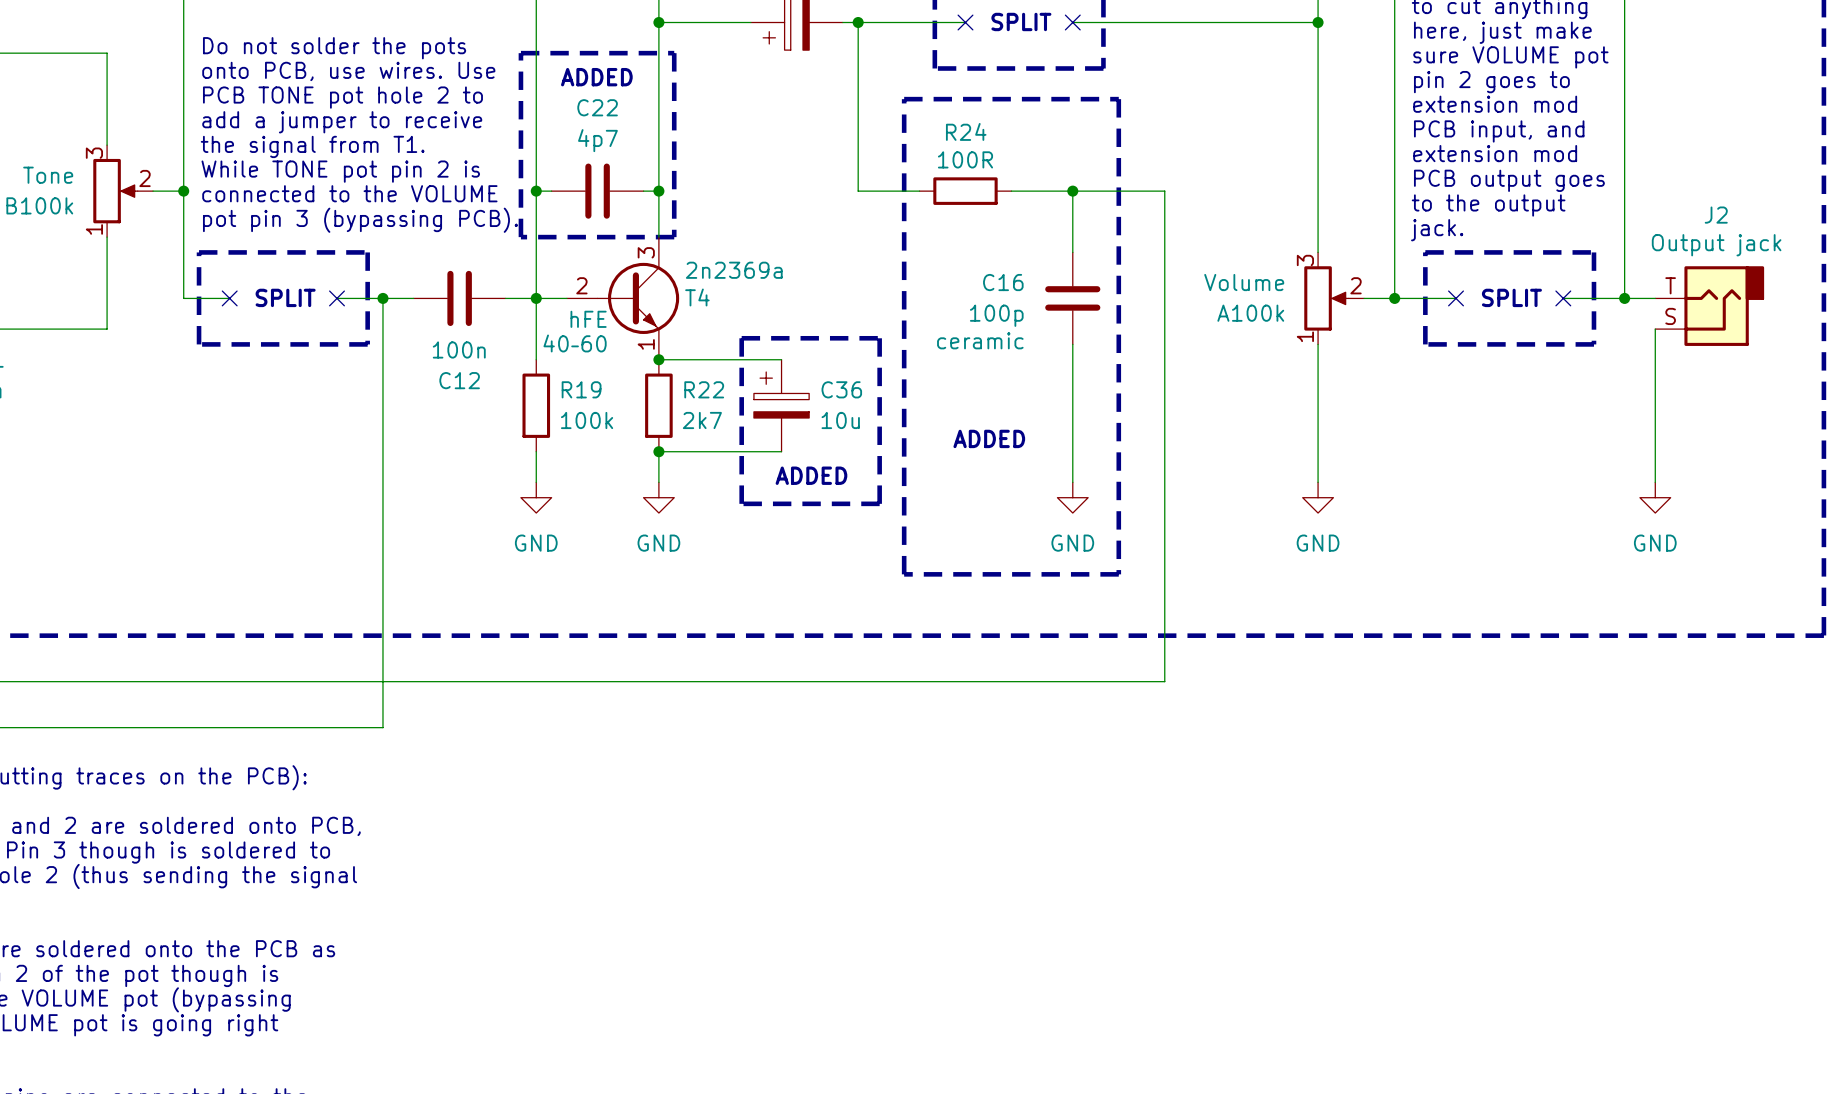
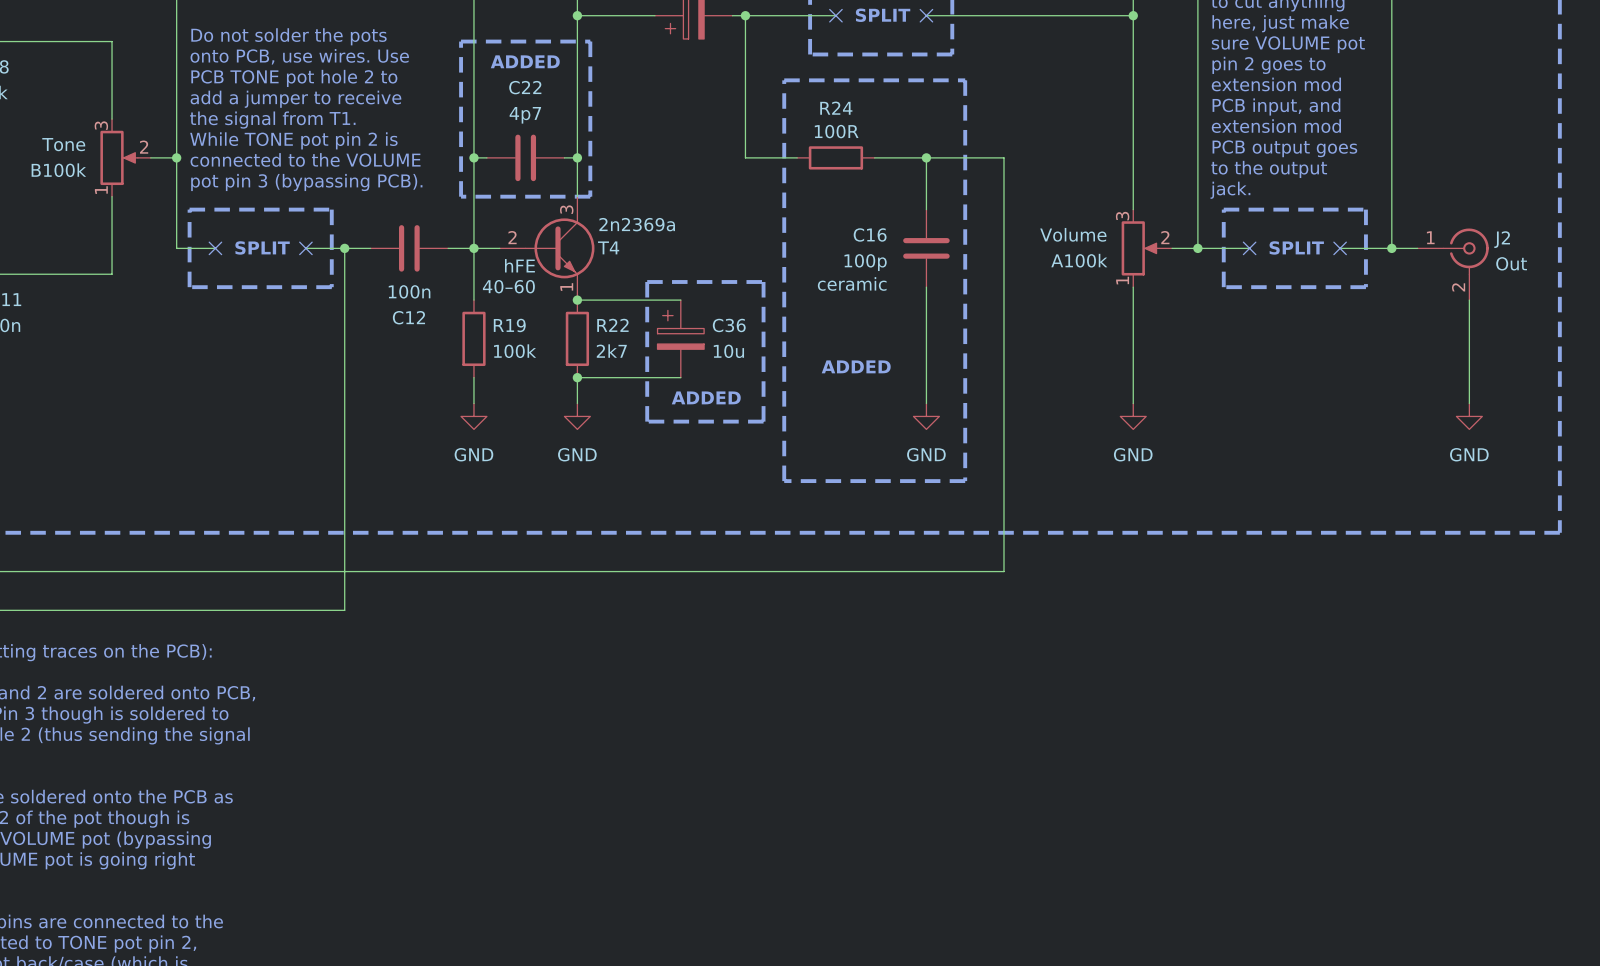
J2 name position: J2 (1716, 215) -> J2 (1502, 239)
J2 value: Output jack (1716, 245) -> Out (1511, 263)
J2 symbol: [1655, 266, 1765, 346] -> [1417, 228, 1489, 301]
wire: (1655, 329) (1655, 482) -> none
wire: none -> (1469, 300) (1469, 403)
power symbol position: GND (1655, 497) -> GND (1469, 416)

